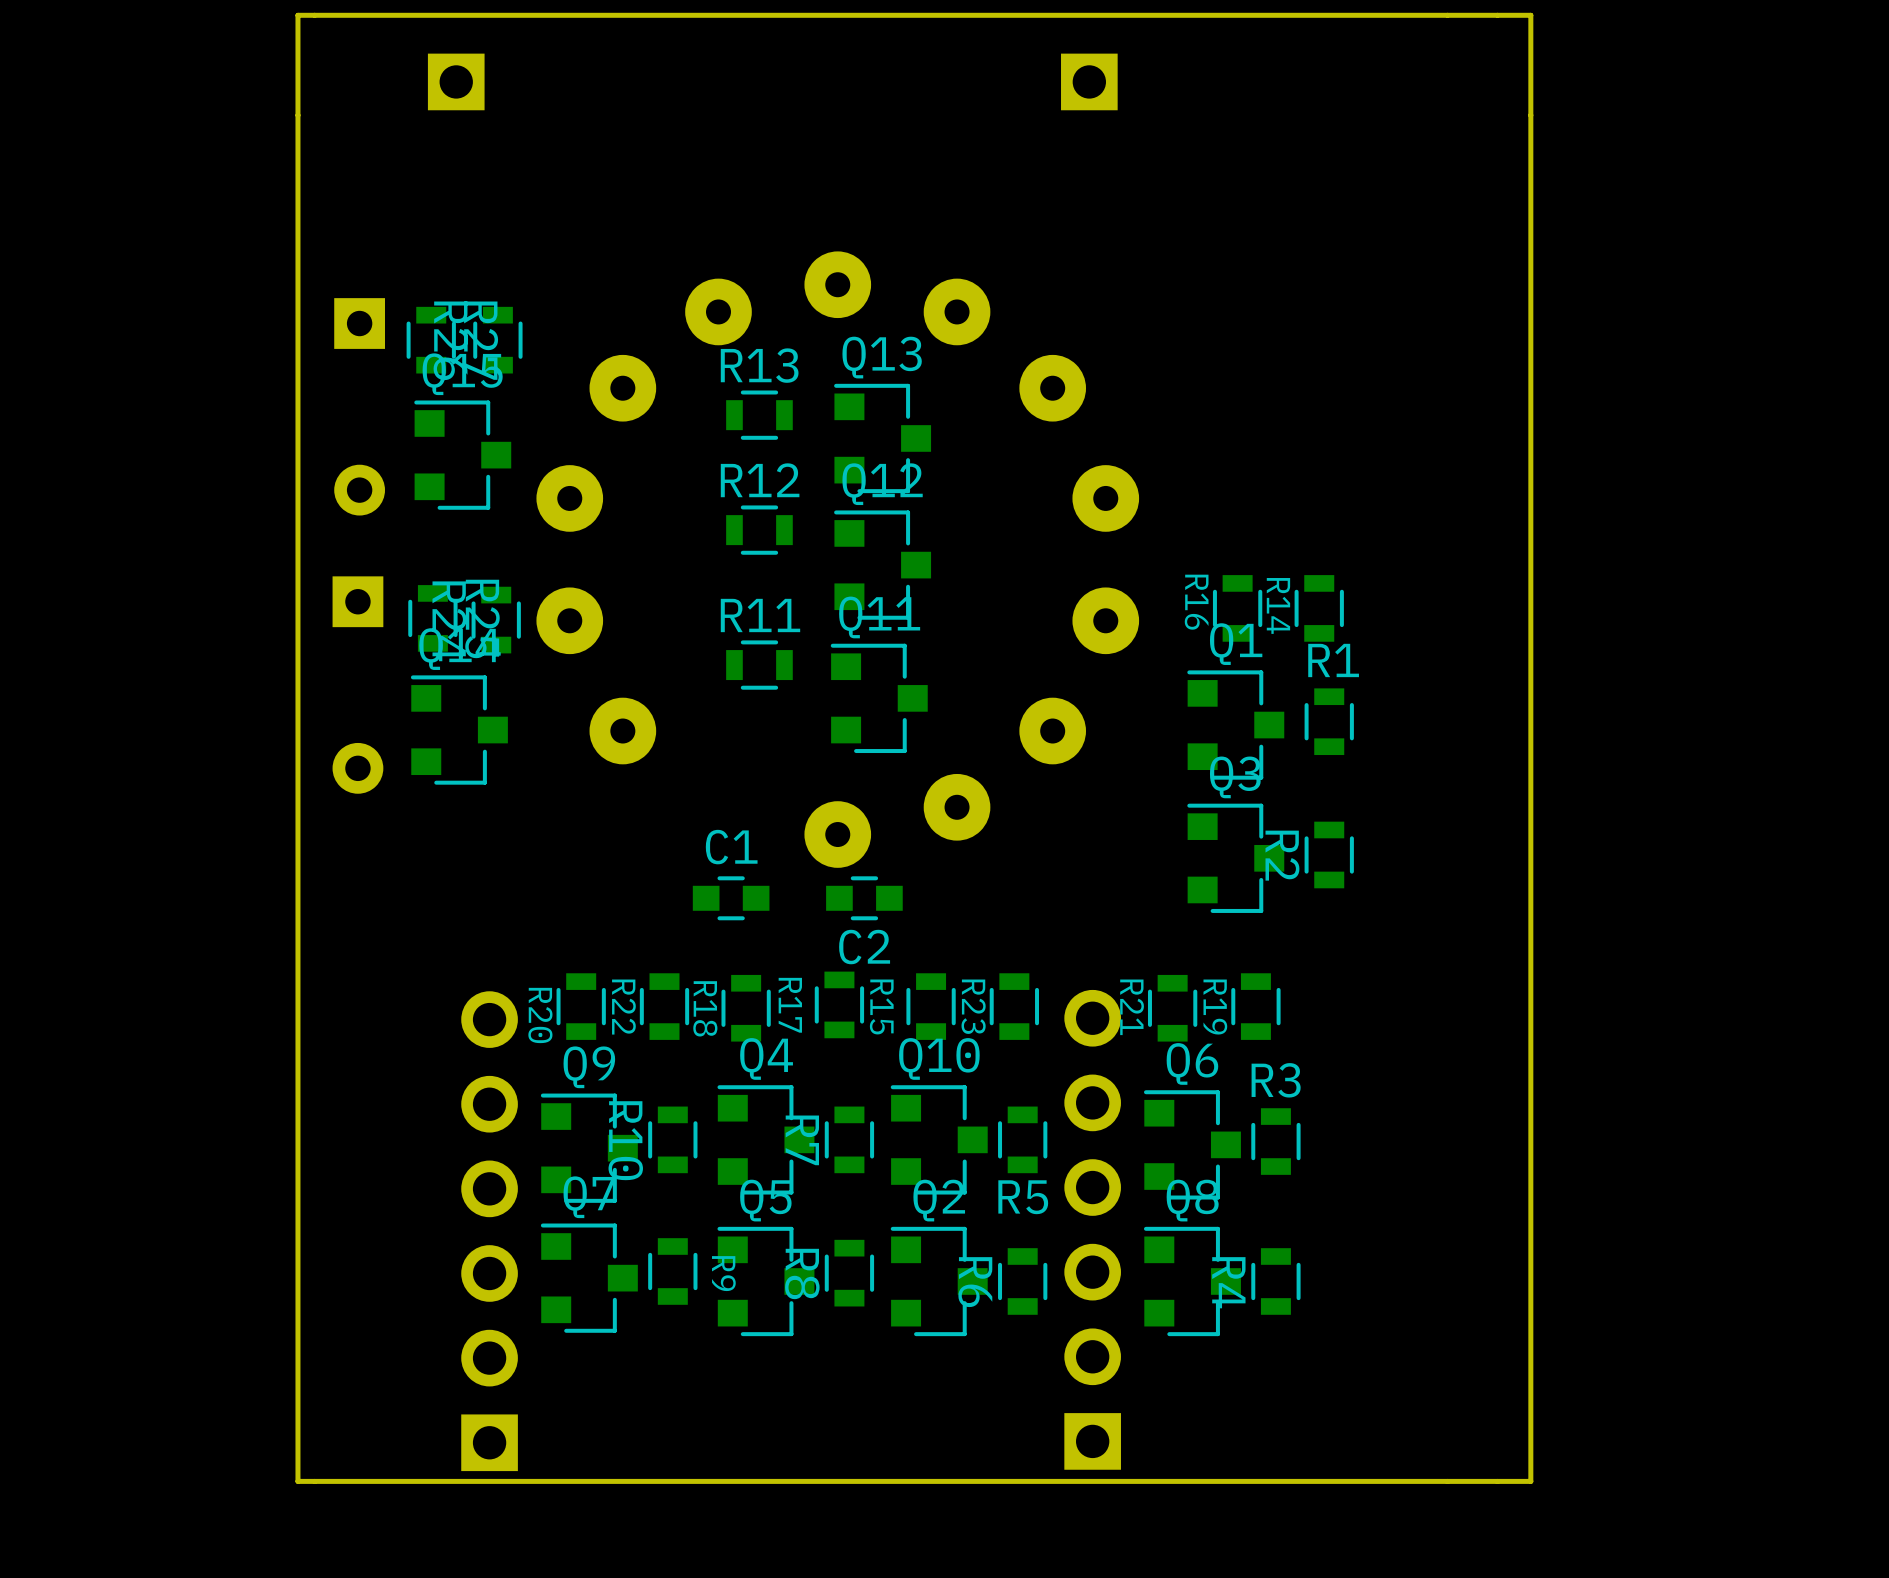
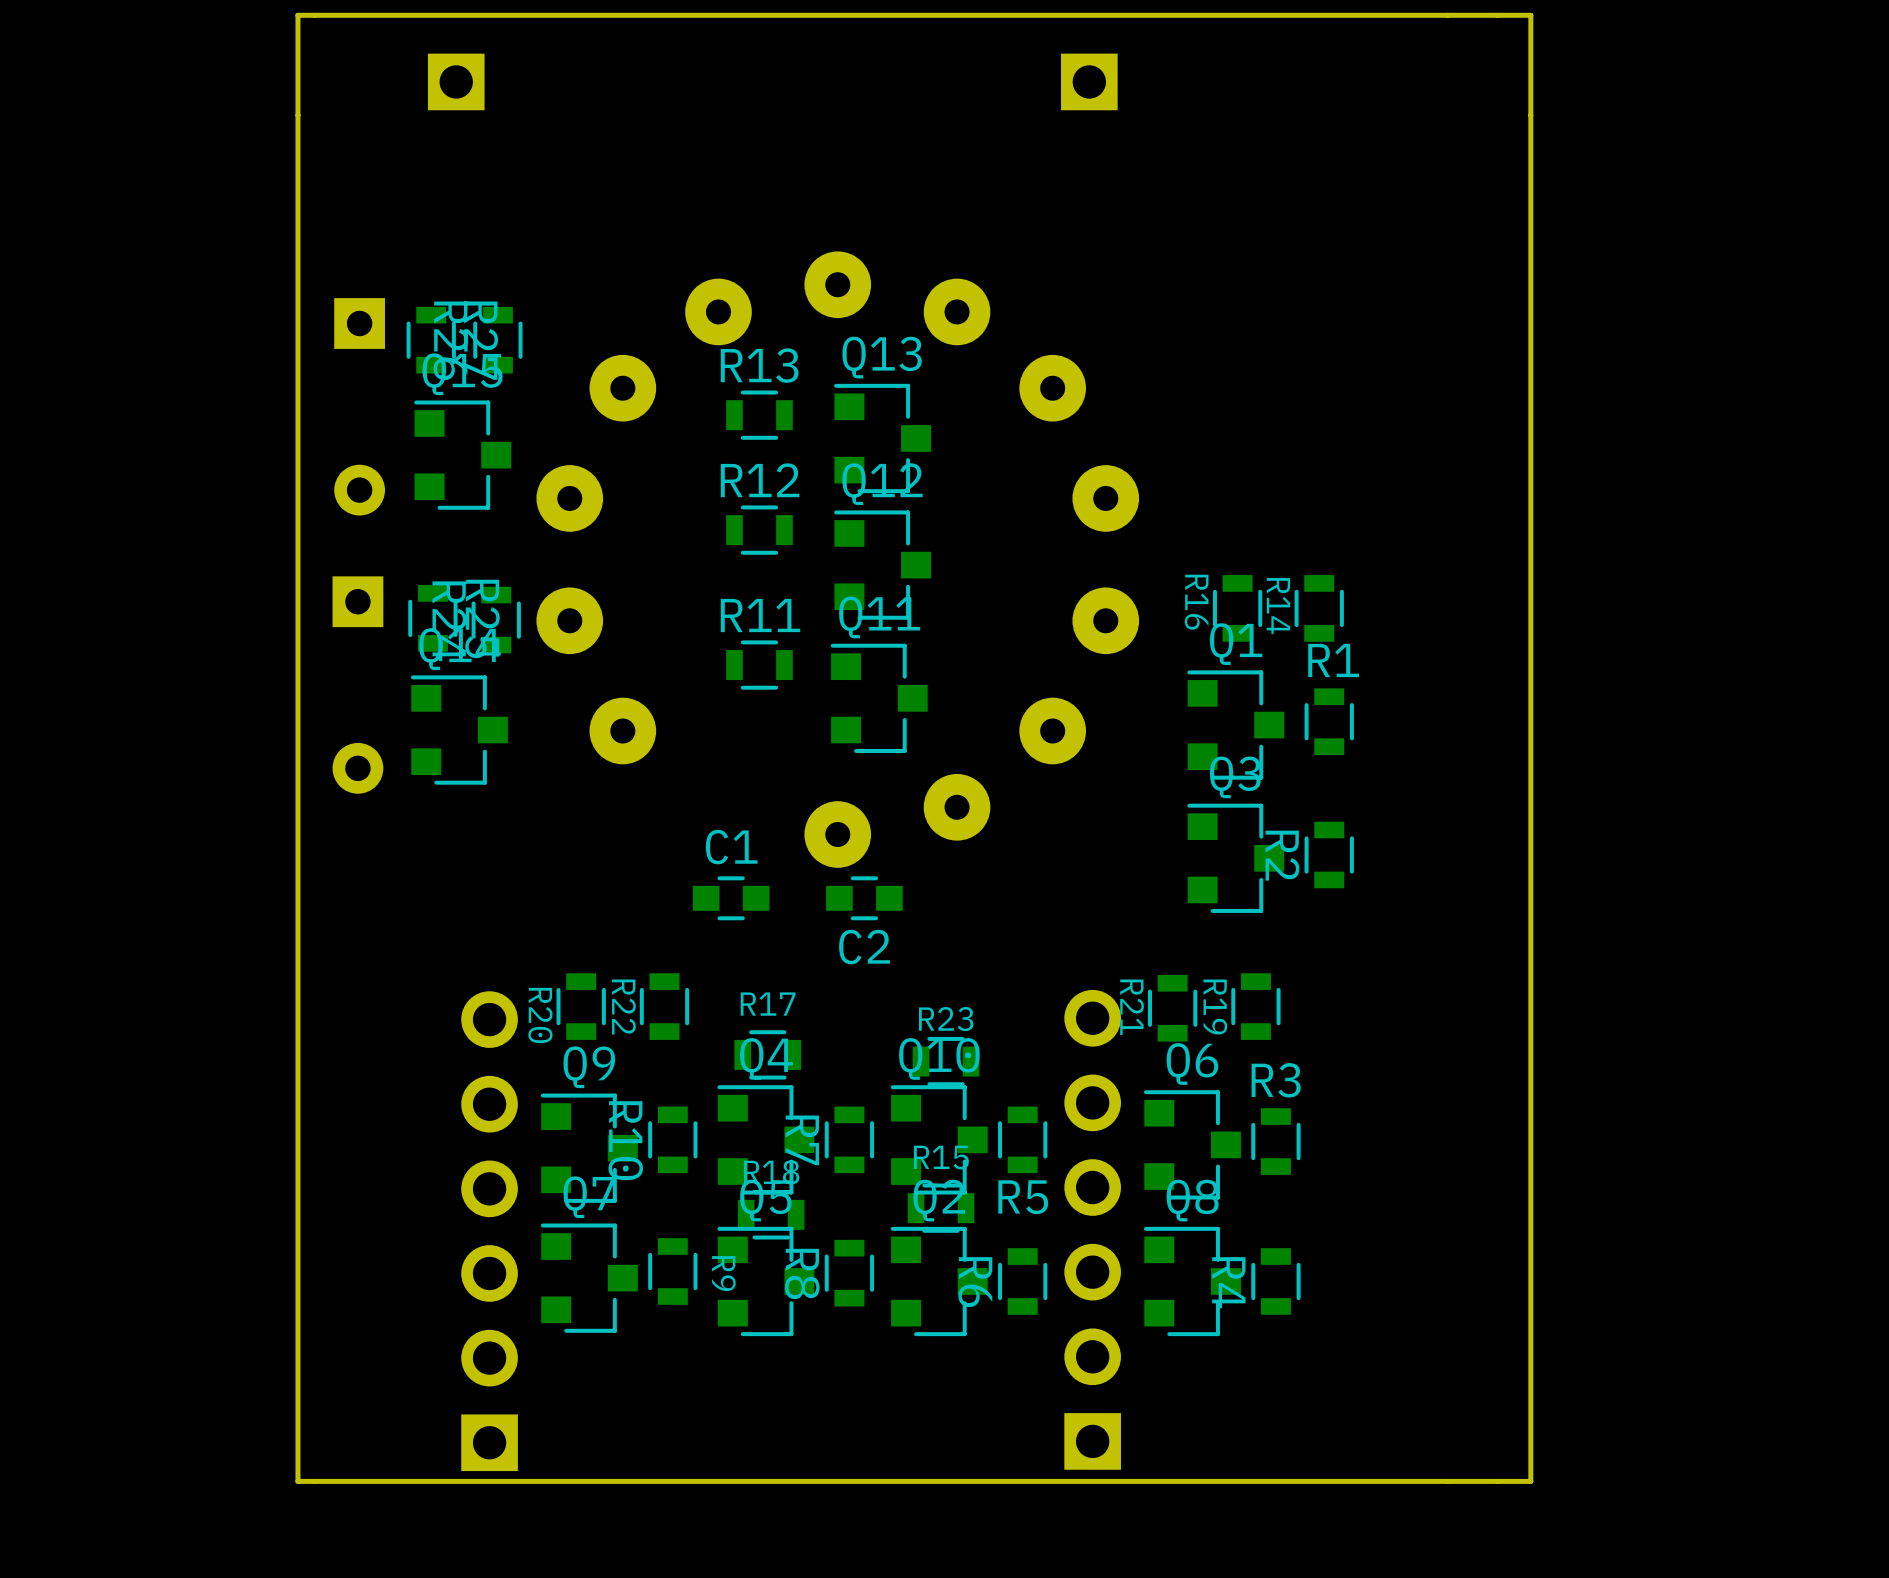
R17 rotation: 0° (839, 1004) -> 90° clockwise (767, 1054)
R17 position: (839, 1004) -> (767, 1054)
R15 rotation: 0° (931, 1006) -> 90° clockwise (941, 1208)
R15 position: (931, 1006) -> (941, 1208)
R23 rotation: 0° (1014, 1006) -> 90° clockwise (946, 1061)
R23 position: (1014, 1006) -> (946, 1061)
R18 rotation: 0° (746, 1008) -> 90° clockwise (771, 1214)
R18 position: (746, 1008) -> (771, 1214)

